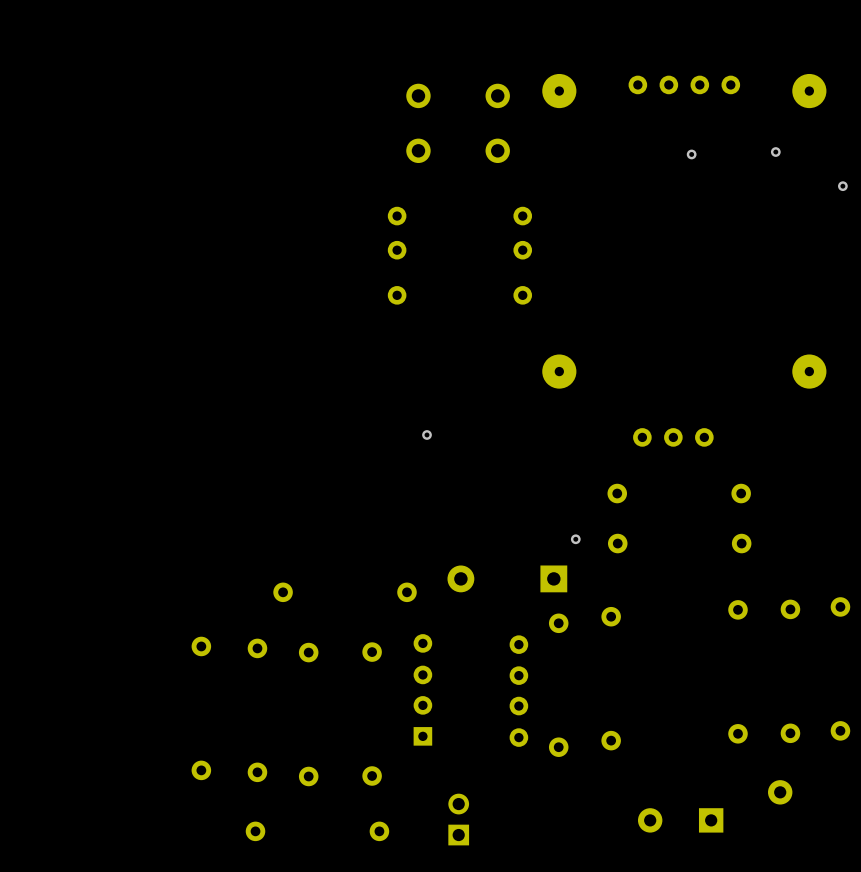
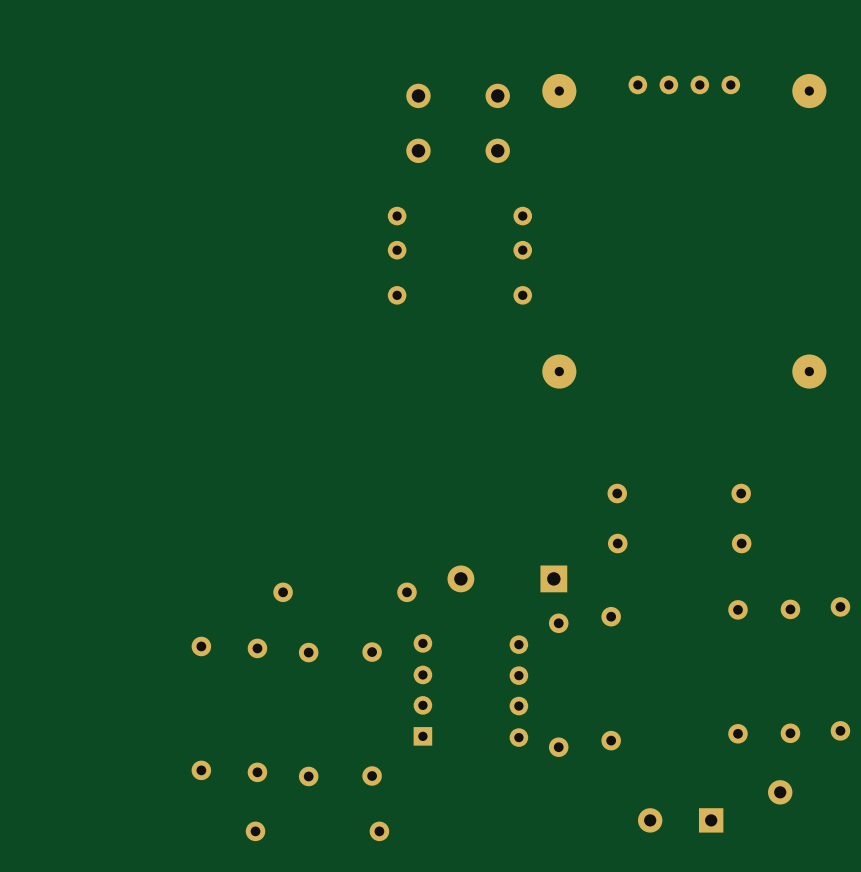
via: (775, 152) -> none
via: (691, 154) -> none
via: (842, 186) -> none
via: (426, 434) -> none
part: (673, 437) -> none
via: (575, 539) -> none
part: (458, 819) -> none

